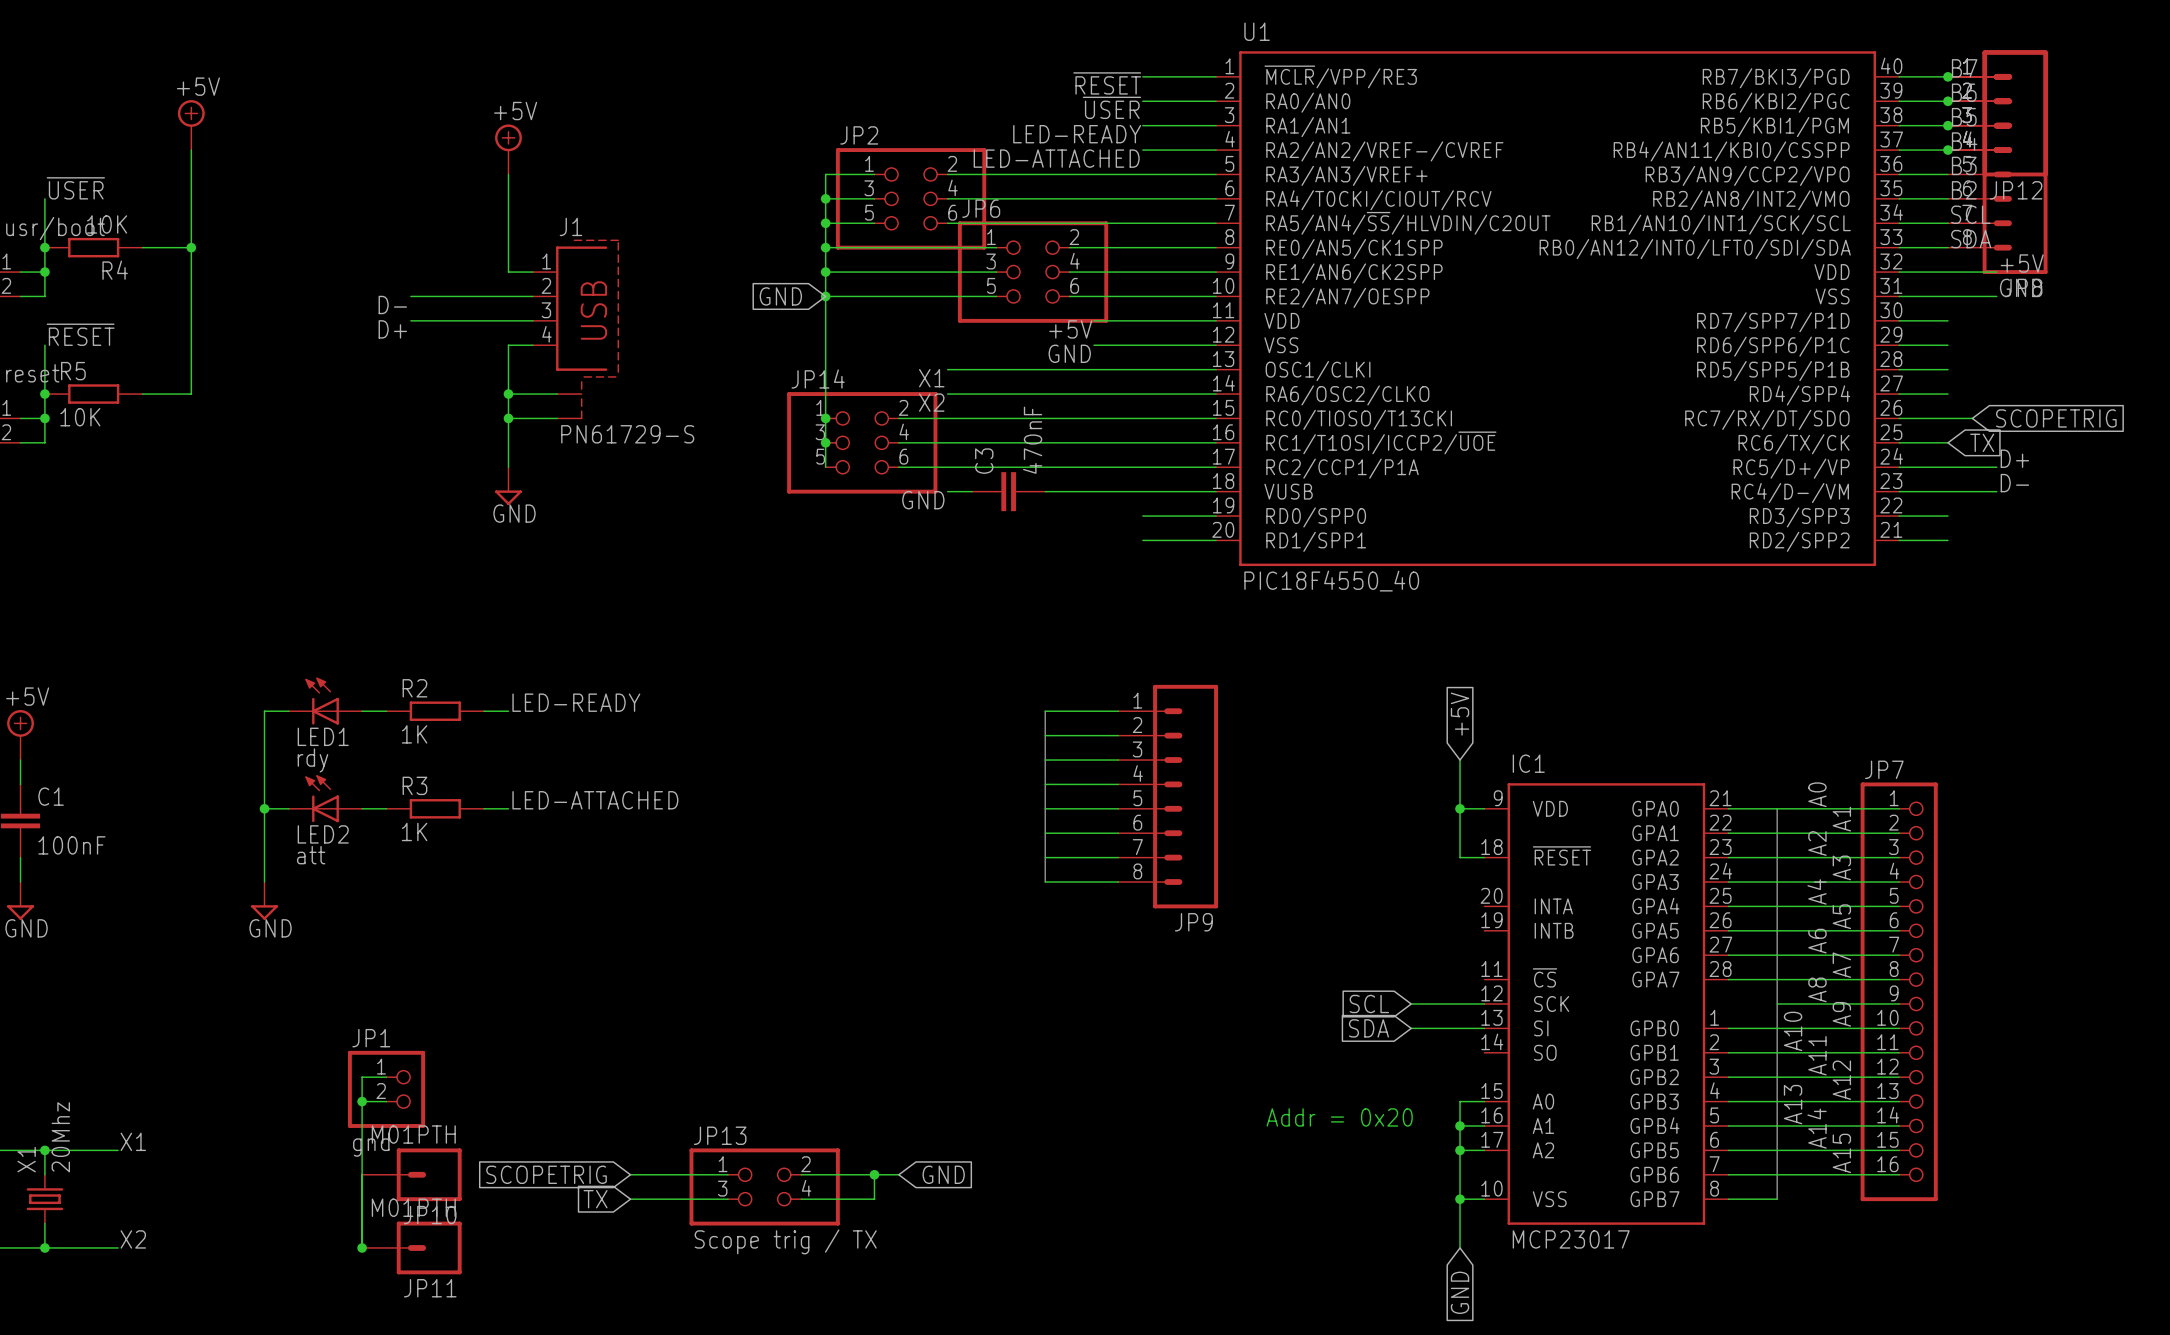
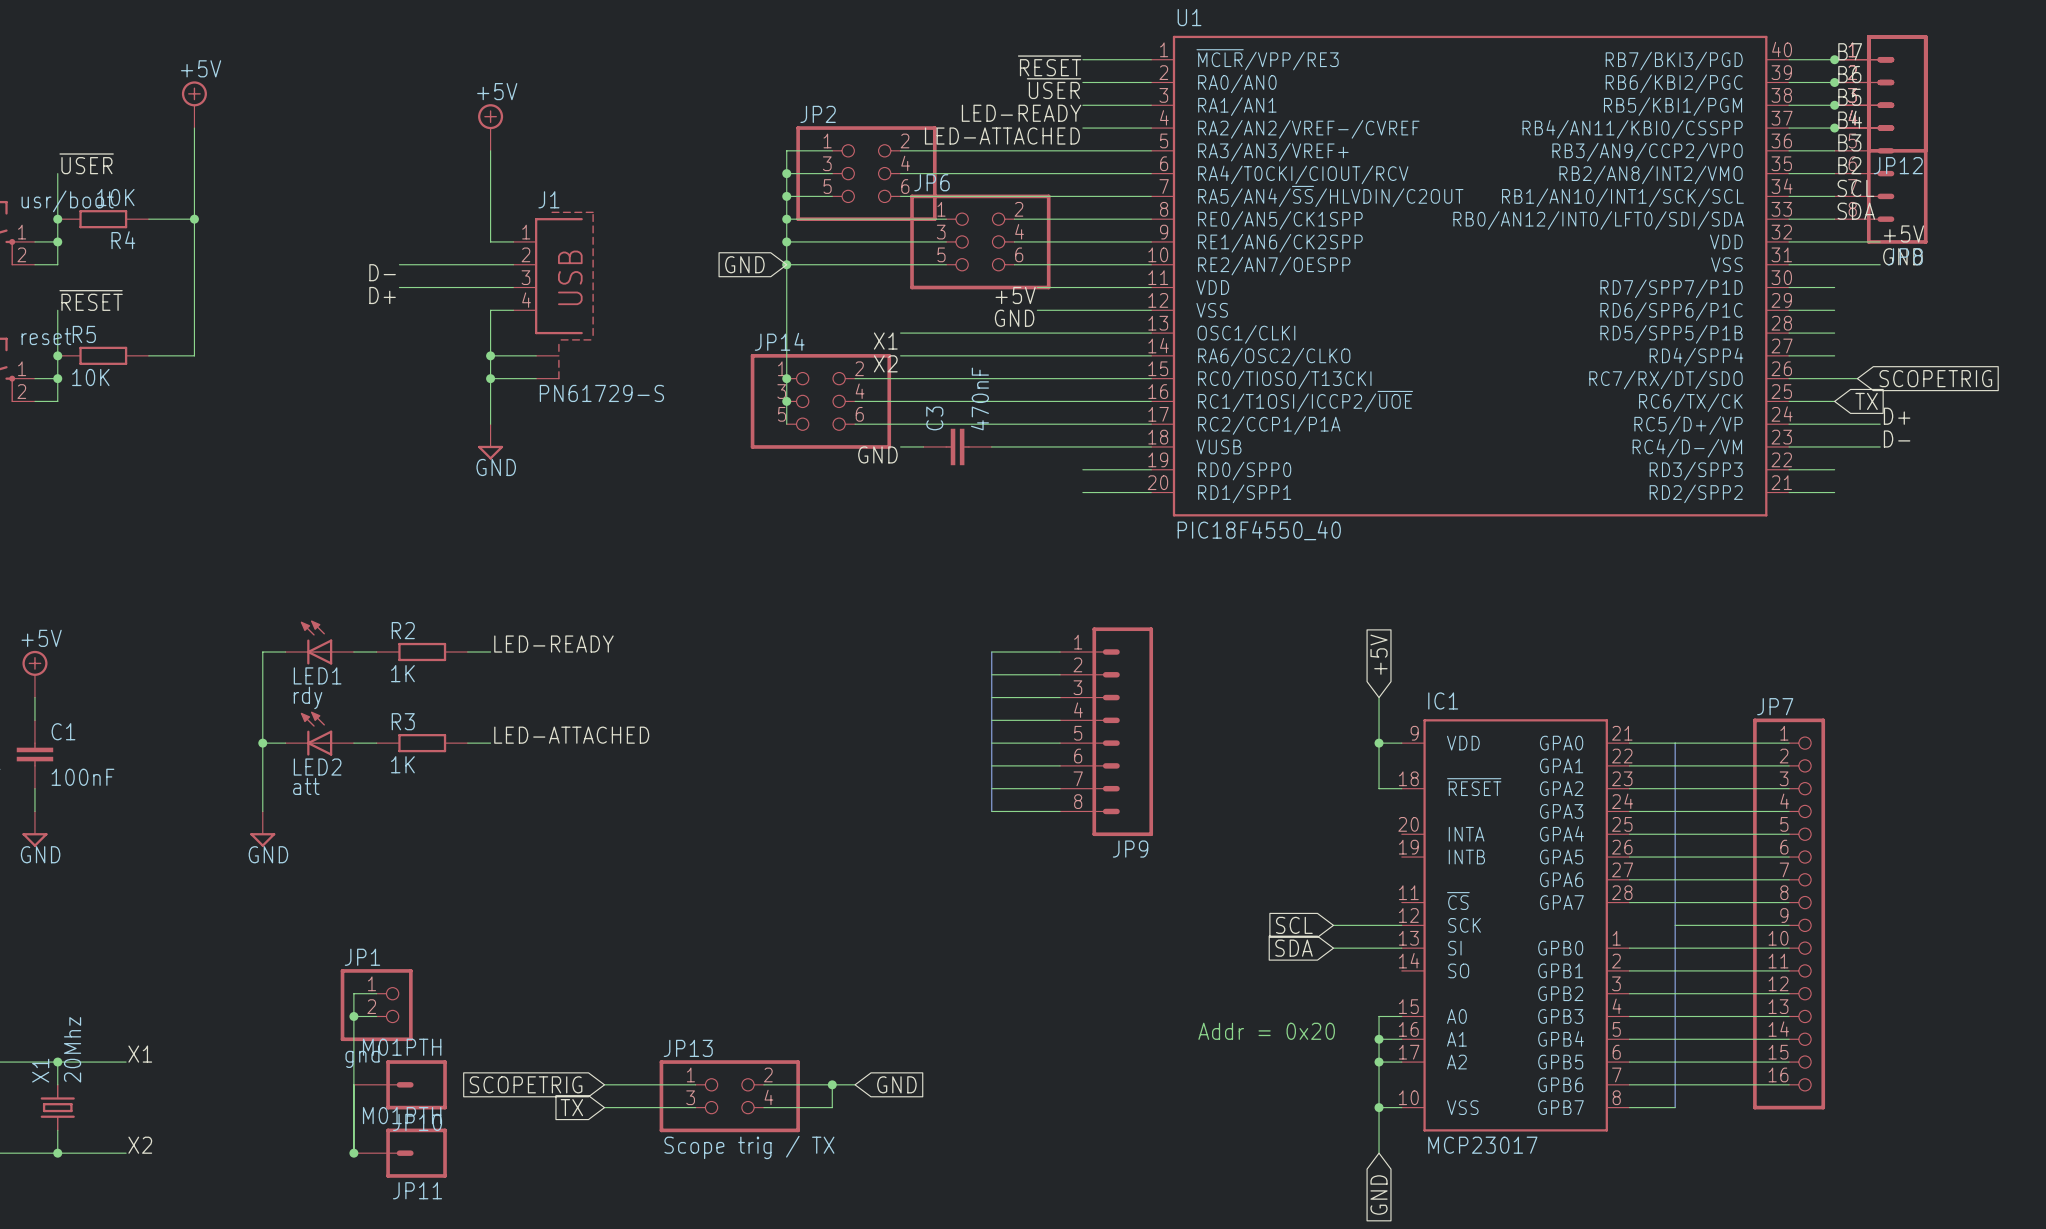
label: A0 (1817, 794) -> none
label: A1 (1841, 819) -> none
label: A2 (1817, 843) -> none
label: A3 (1841, 867) -> none
label: A4 (1817, 891) -> none
label: A5 (1841, 916) -> none
label: A6 (1817, 941) -> none
label: A7 (1841, 965) -> none
label: A8 (1817, 989) -> none
label: A9 (1841, 1014) -> none
label: A10 (1793, 1031) -> none
label: A11 (1817, 1055) -> none
label: A12 (1841, 1080) -> none
label: A13 (1793, 1104) -> none
label: A14 (1817, 1128) -> none
label: A15 (1841, 1153) -> none

